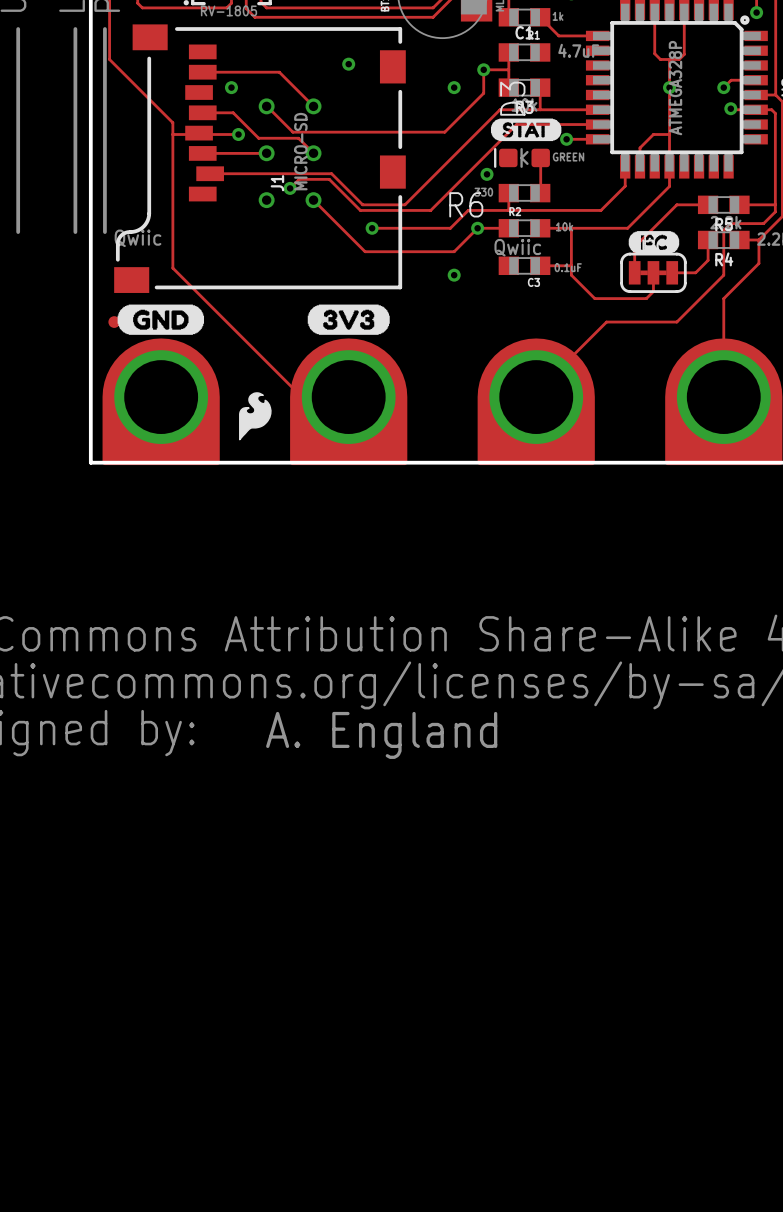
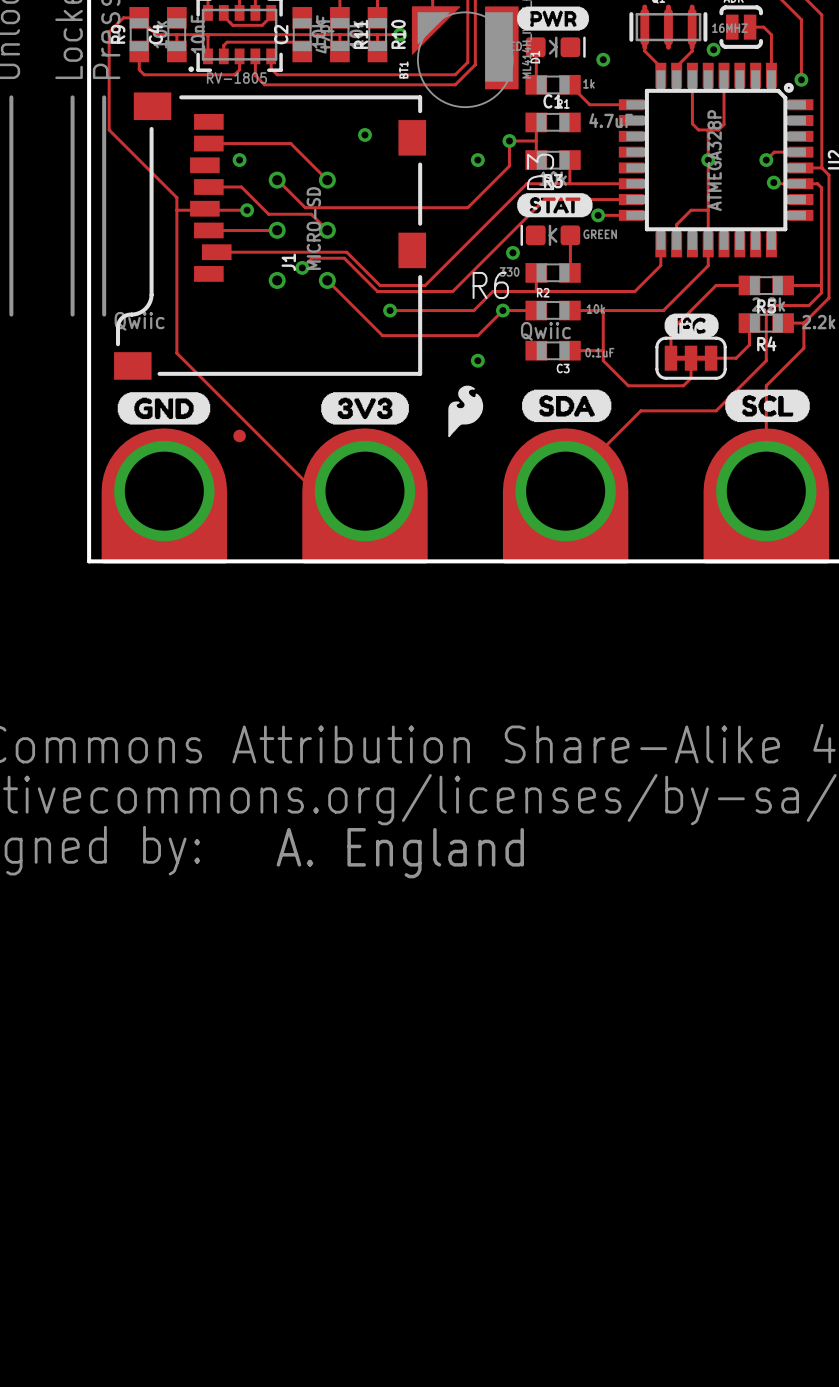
drawing: none -> [522, 389, 612, 423]
drawing: none -> [725, 389, 810, 423]
part position: (114, 322) -> (239, 435)
drawing position: (255, 416) -> (465, 411)

